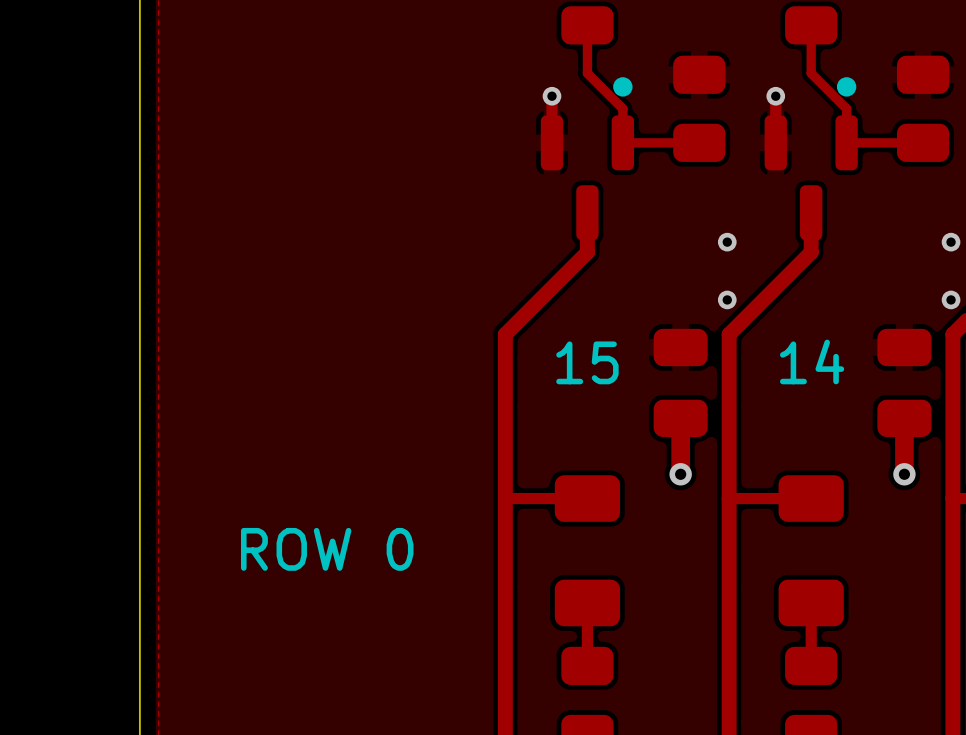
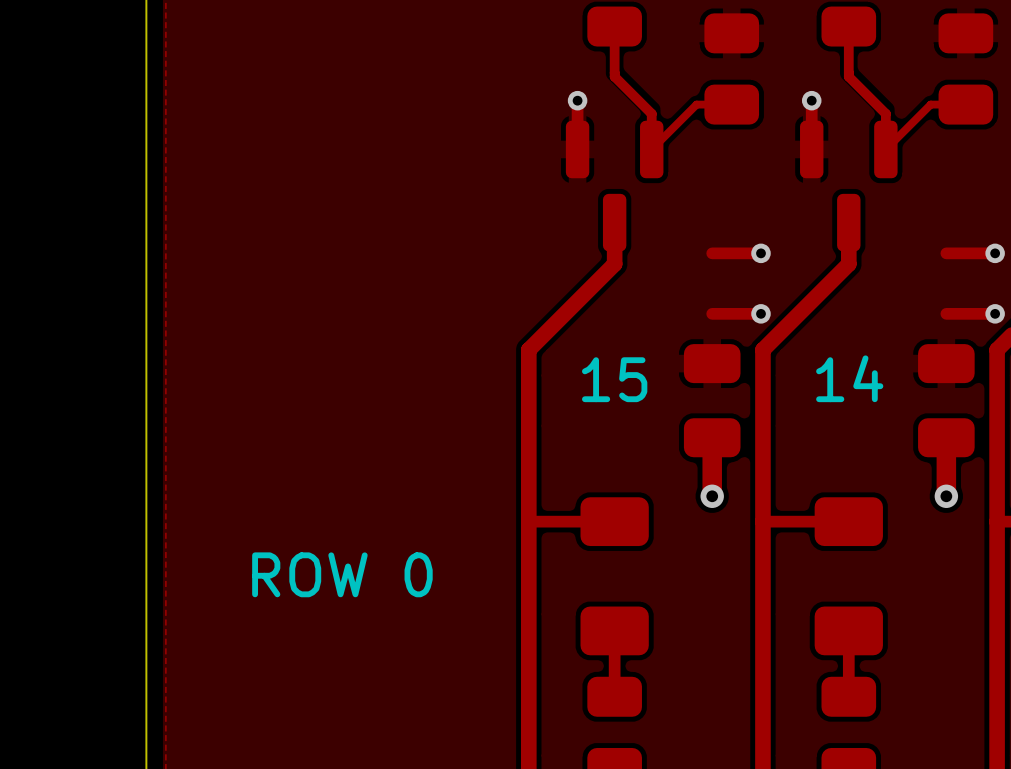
drawing: [613, 77, 633, 97] -> none
drawing: [836, 77, 857, 97] -> none
part position: (699, 108) -> (731, 68)
part position: (923, 108) -> (965, 68)
track: (622, 142) (699, 142) -> (651, 149) (696, 104) (731, 104)
track: (846, 142) (923, 142) -> (885, 149) (930, 104) (965, 104)
track: none -> (712, 253) (760, 253)
track: none -> (946, 253) (995, 253)
track: none -> (712, 313) (760, 313)
track: none -> (946, 313) (995, 313)

